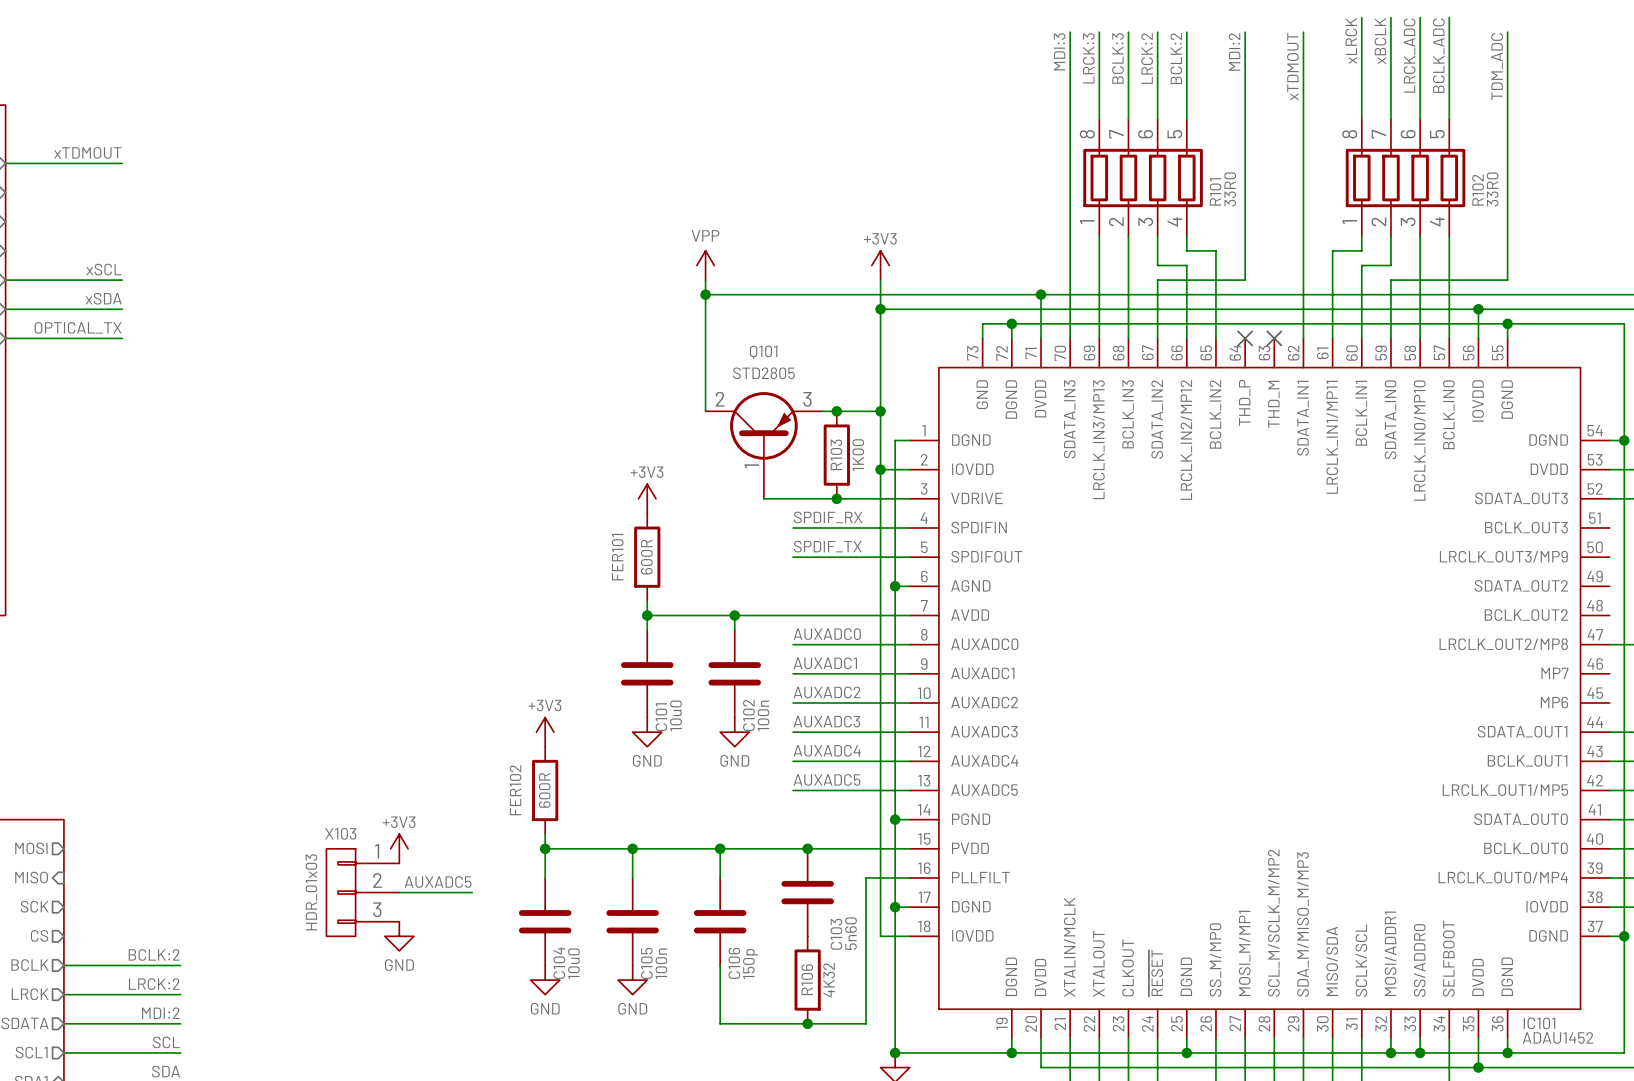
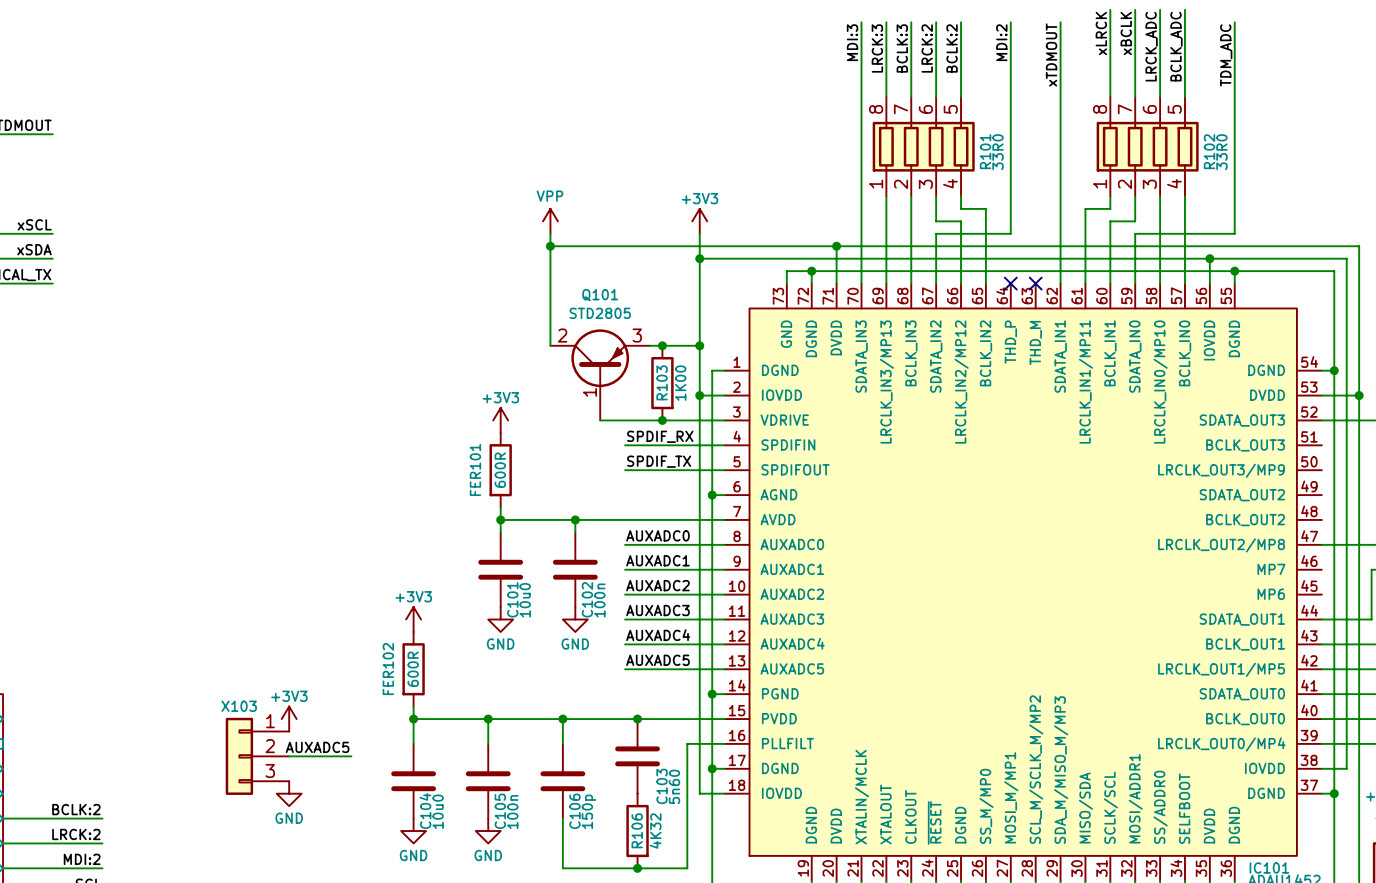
X103 symbol: [326, 848, 400, 937] -> [225, 717, 290, 795]
X103 value: HDR_01x03 (311, 892) -> none

